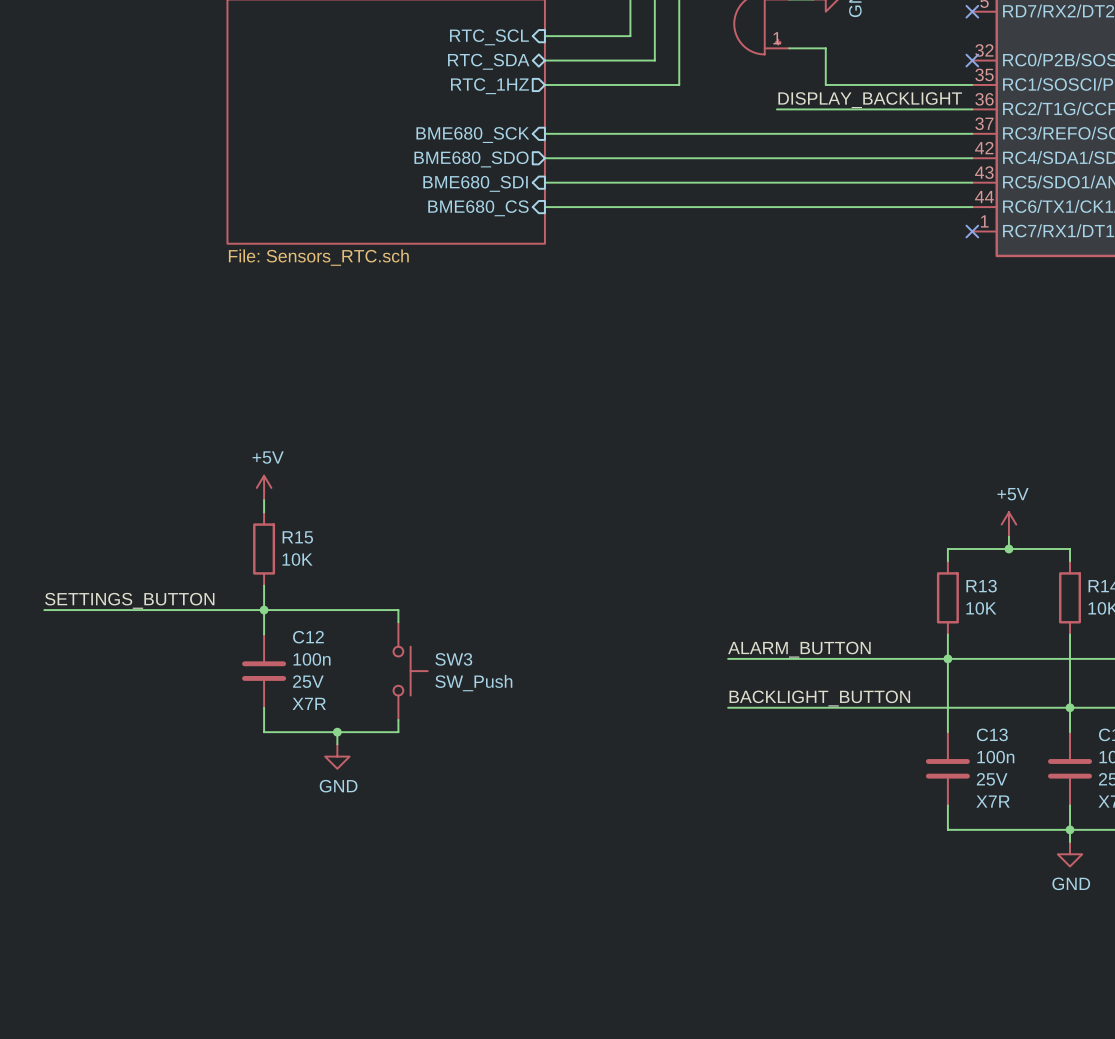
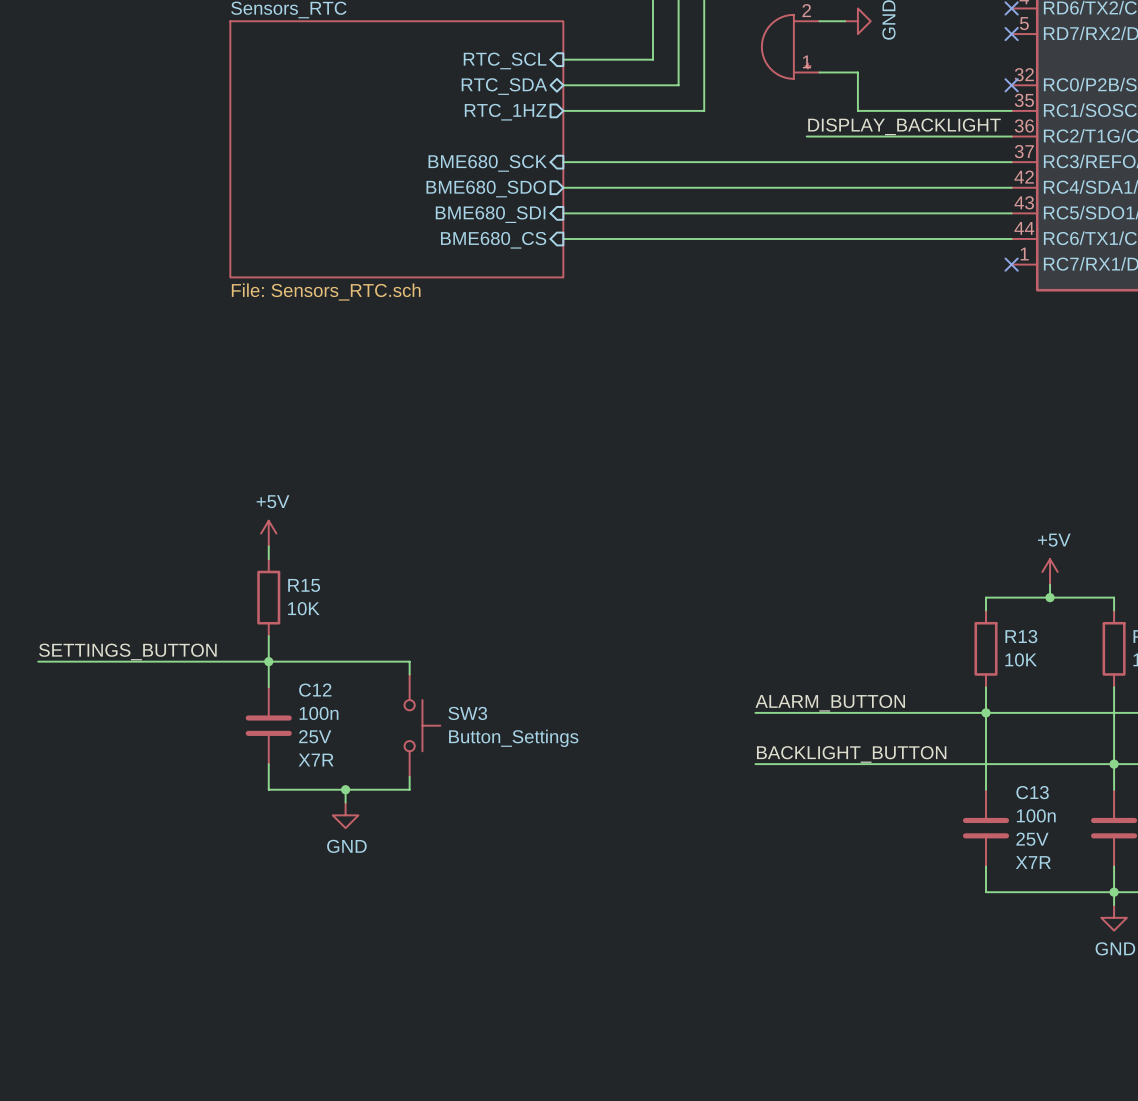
SW3 value: SW_Push (473, 683) -> Button_Settings (513, 738)

